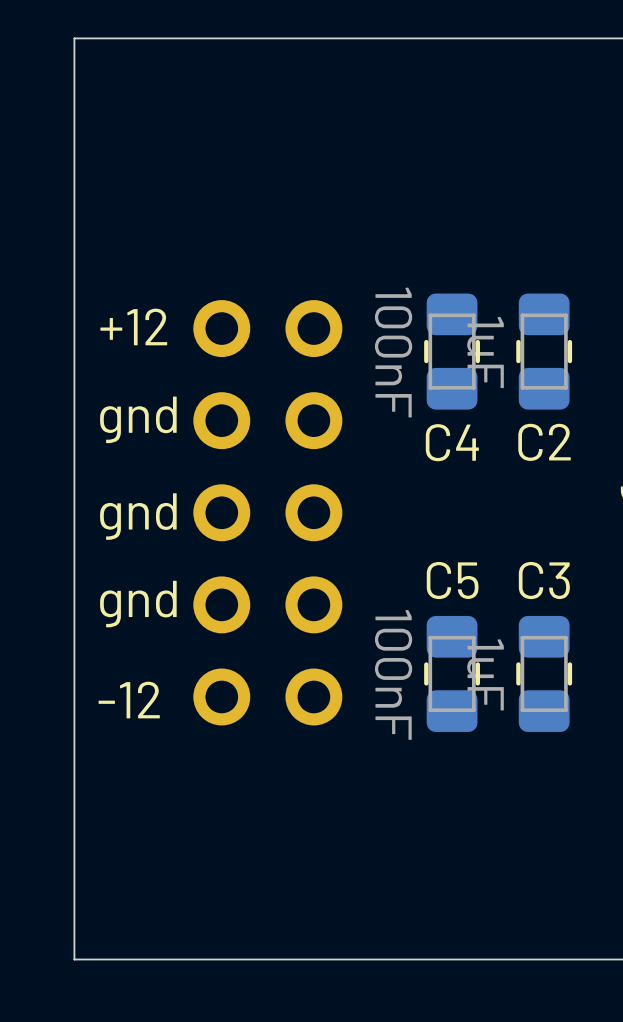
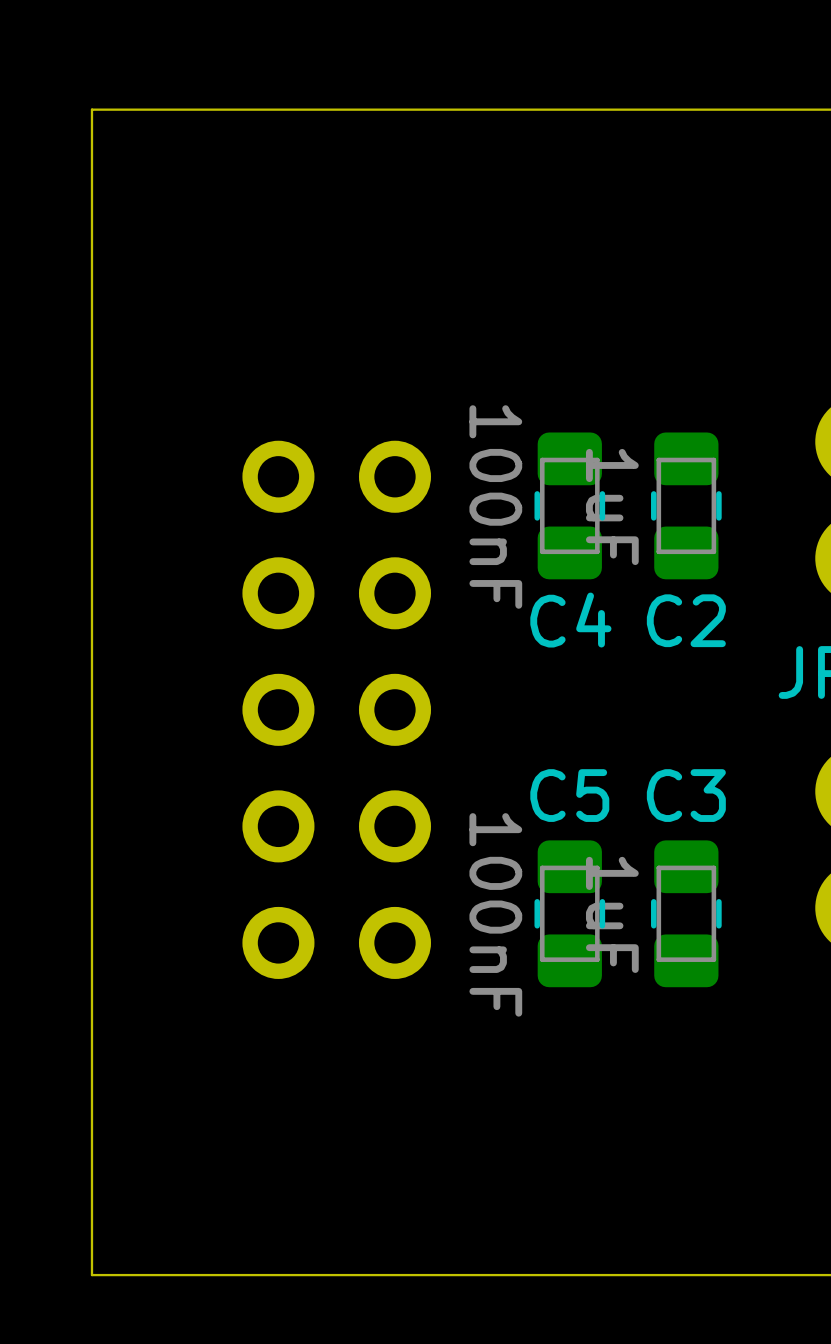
text: +12 (133, 326) -> none
text: gnd (138, 419) -> none
text: gnd (138, 516) -> none
text: gnd (138, 604) -> none
text: -12 (129, 700) -> none

